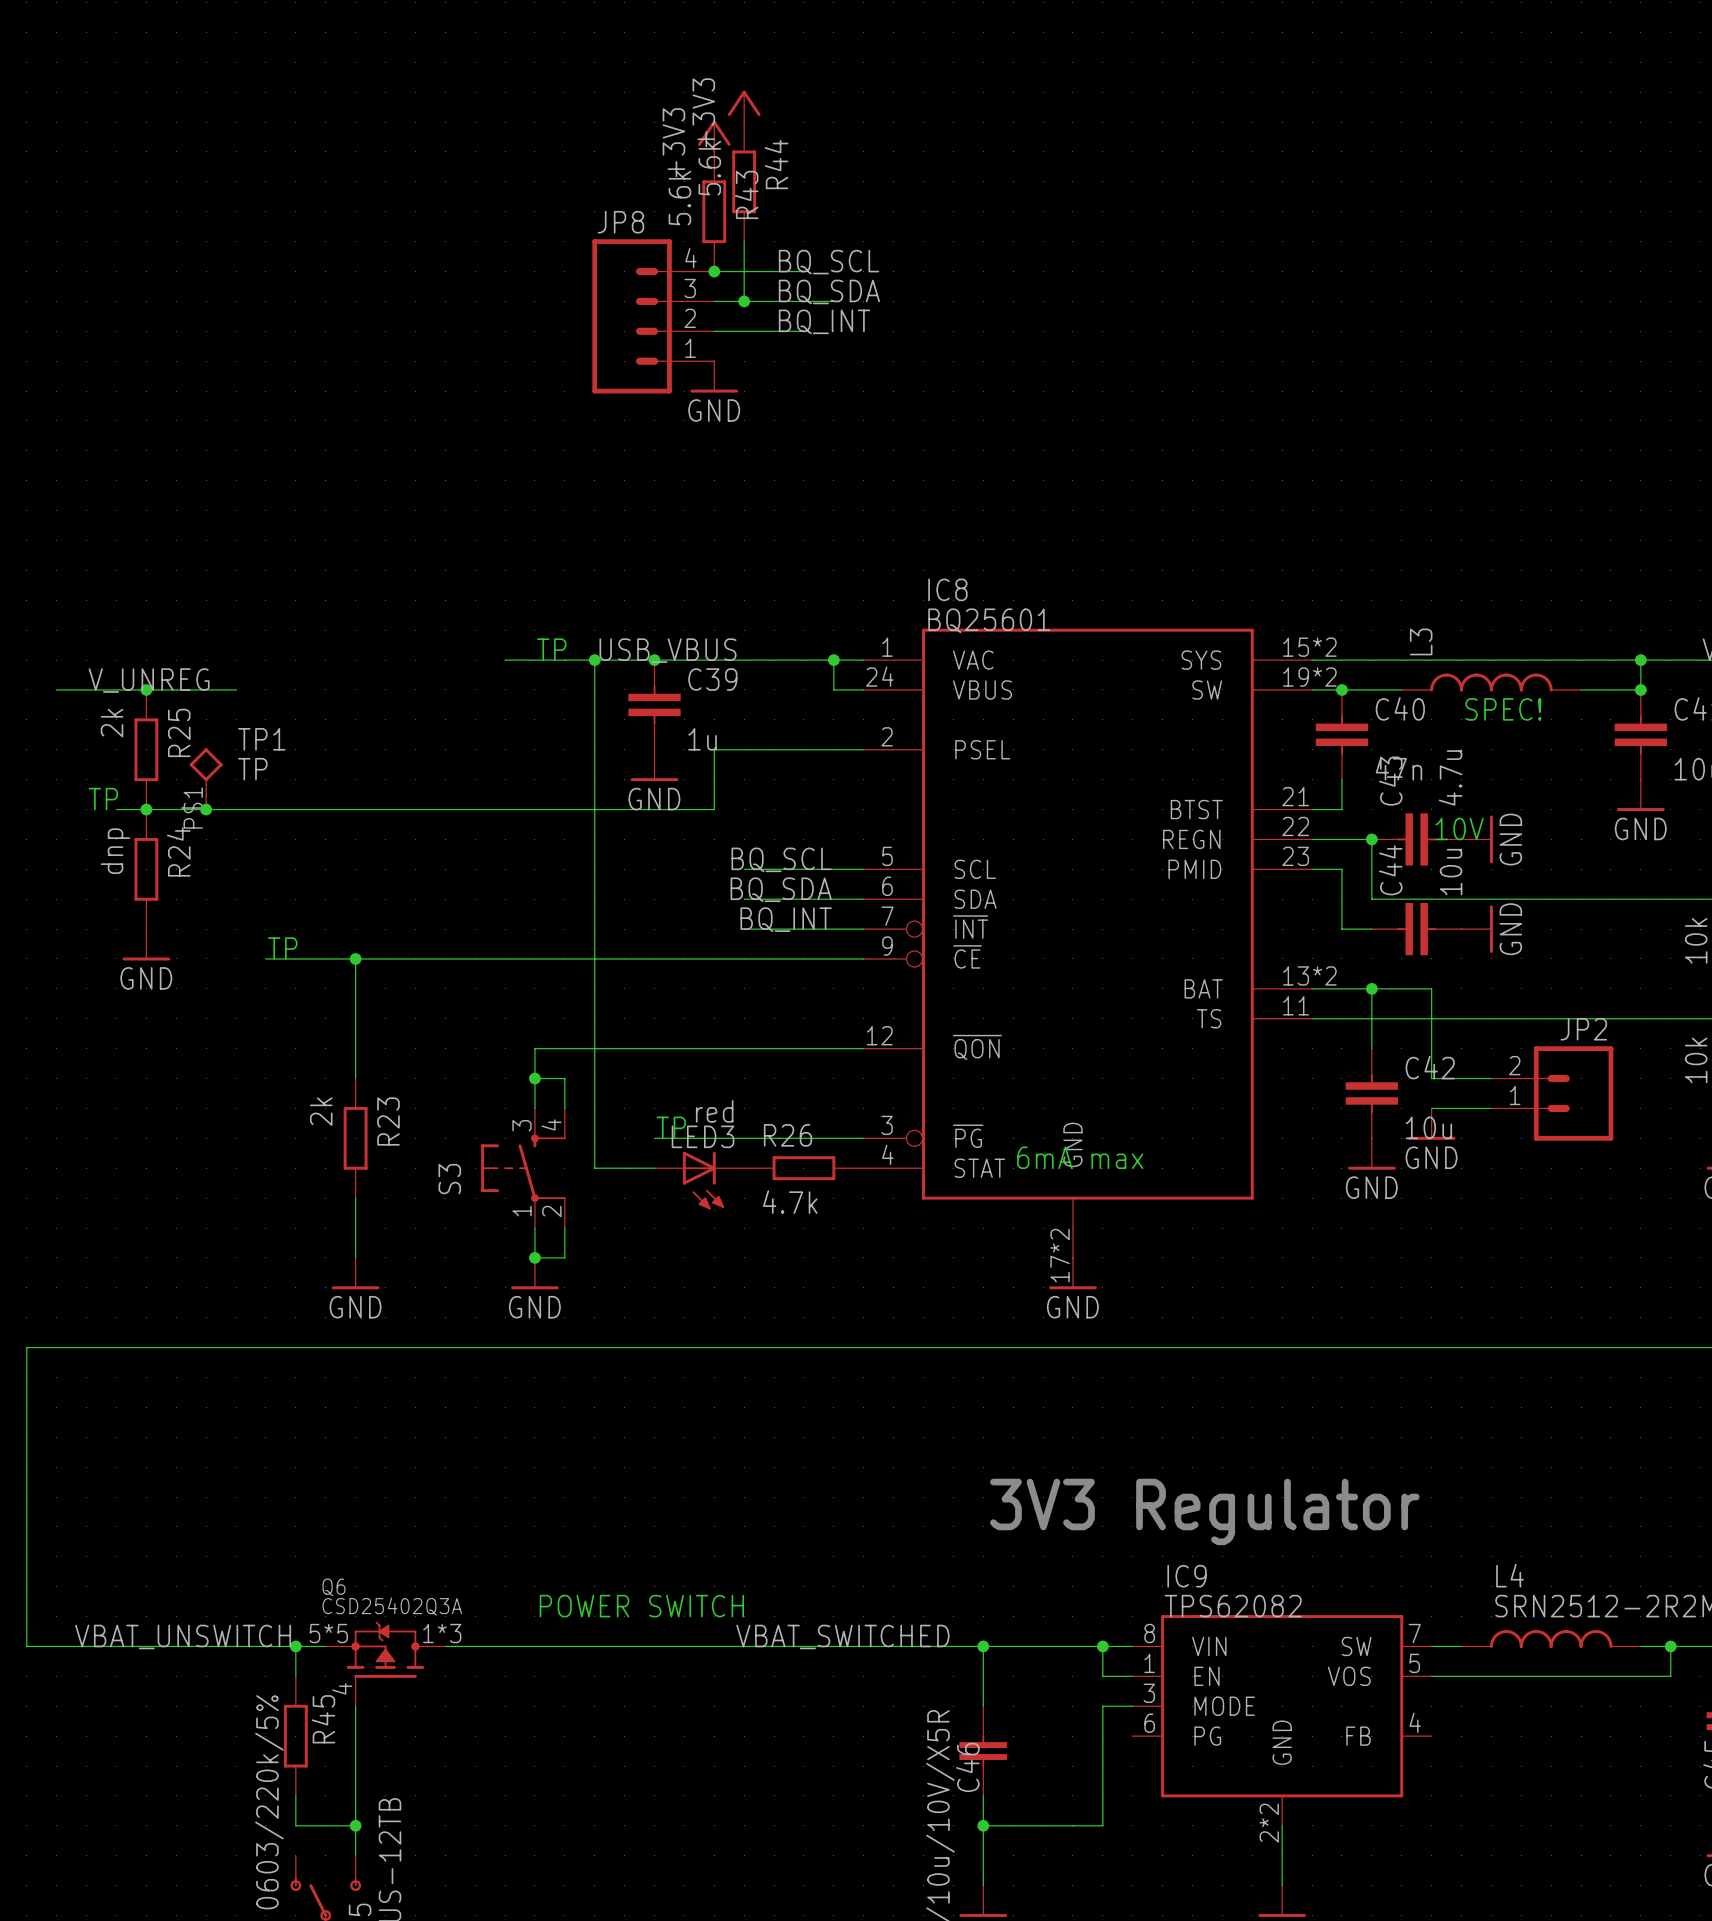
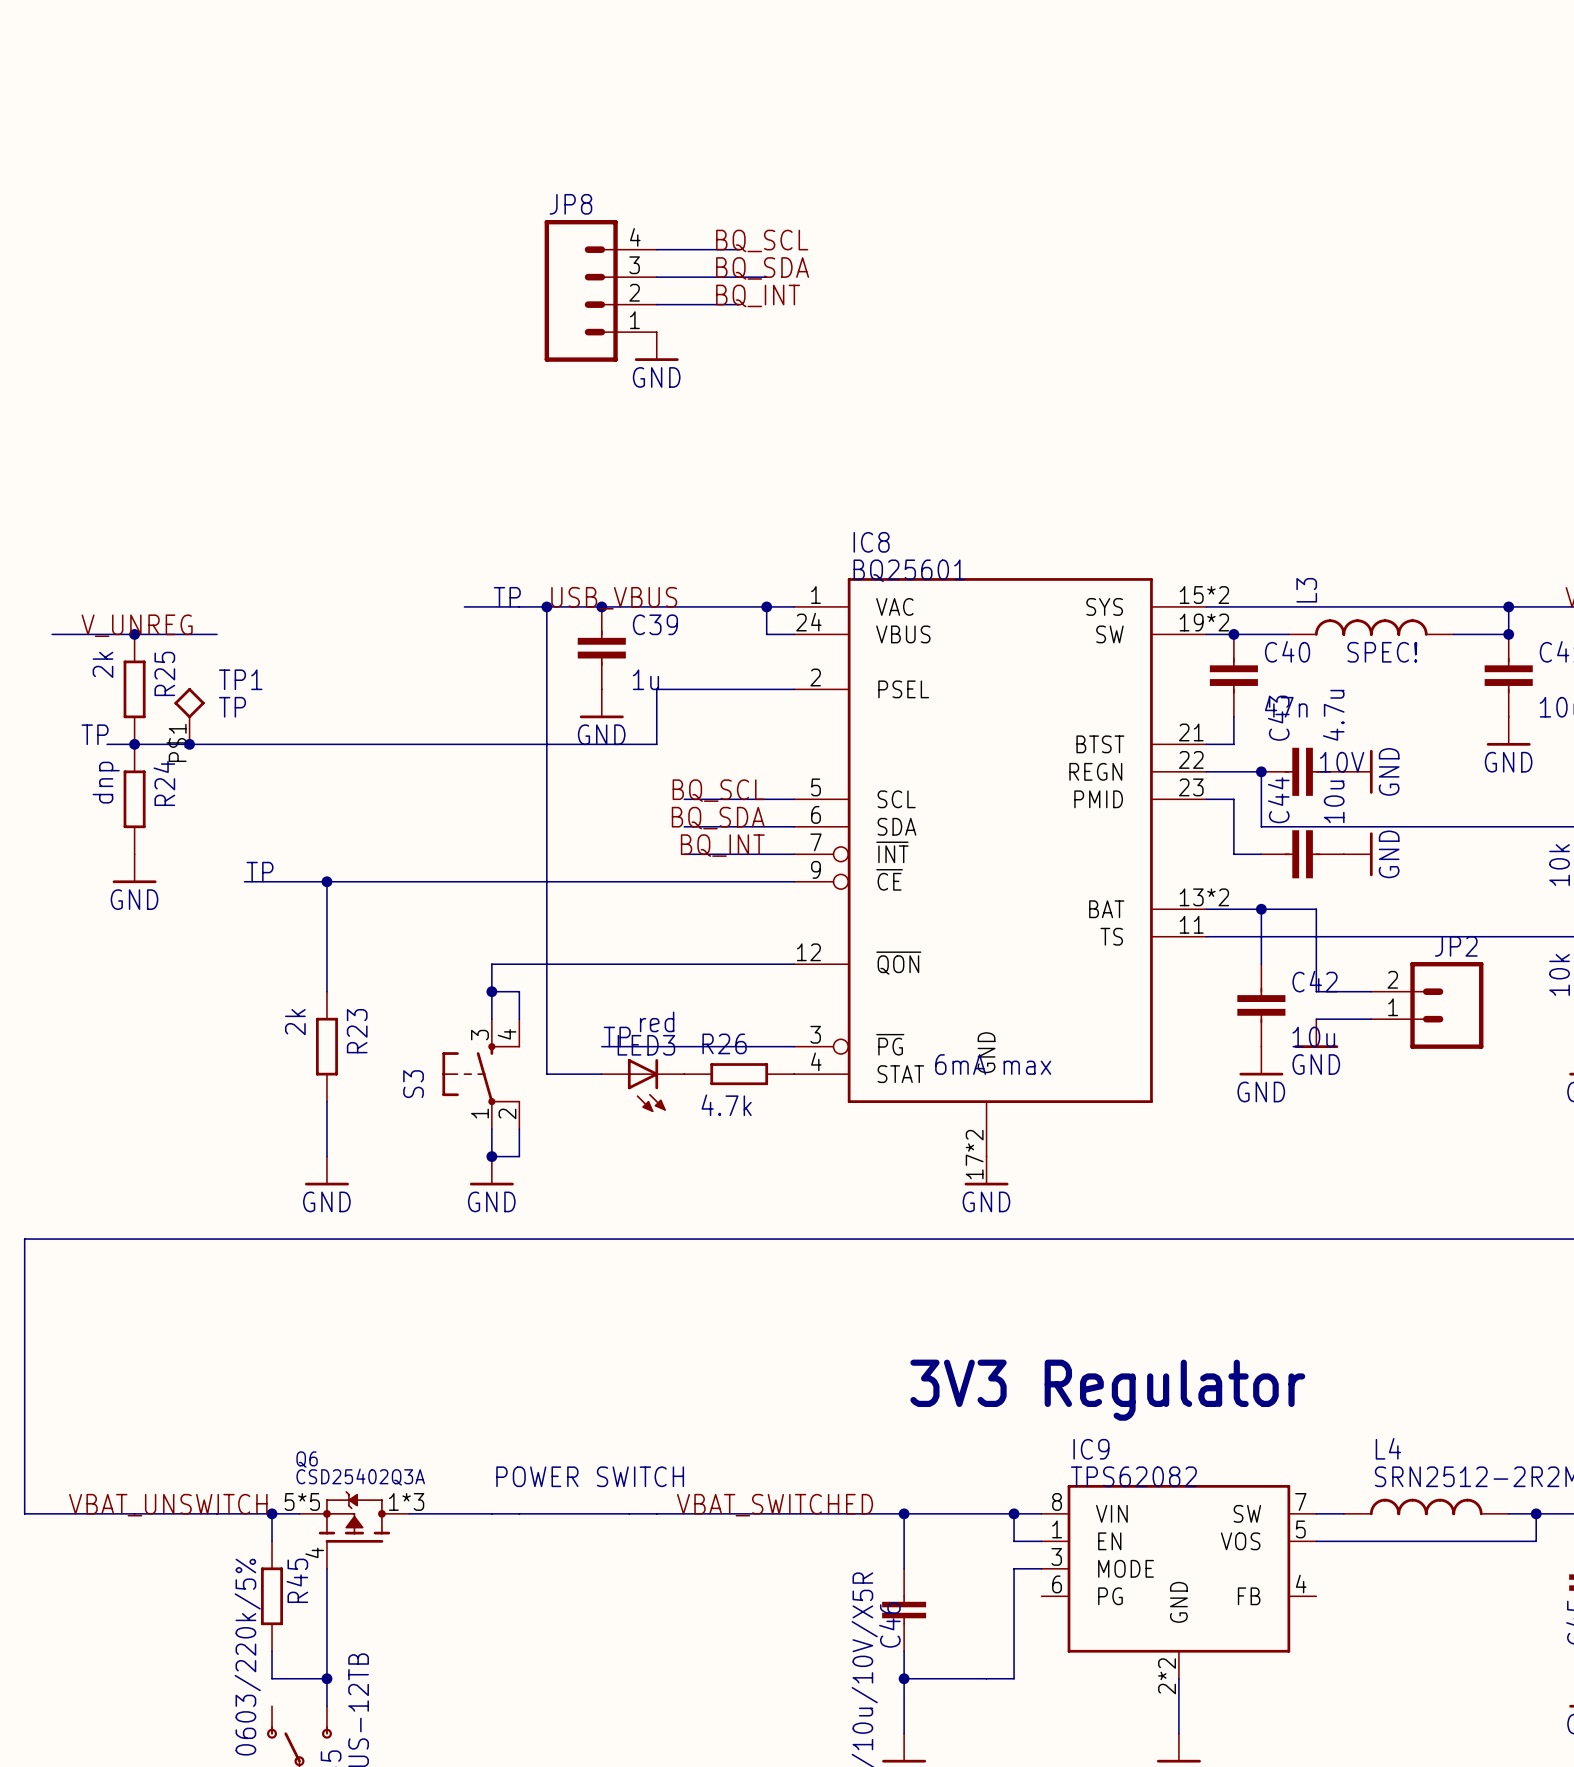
power symbol: +3V3 (744, 106) -> none
power symbol: +3V3 (714, 136) -> none
R44: 5.6k (744, 181) -> none
R43: 5.6k (714, 211) -> none
wire: (744, 241) (744, 301) -> none
junction: (714, 271) -> none
junction: (744, 301) -> none

